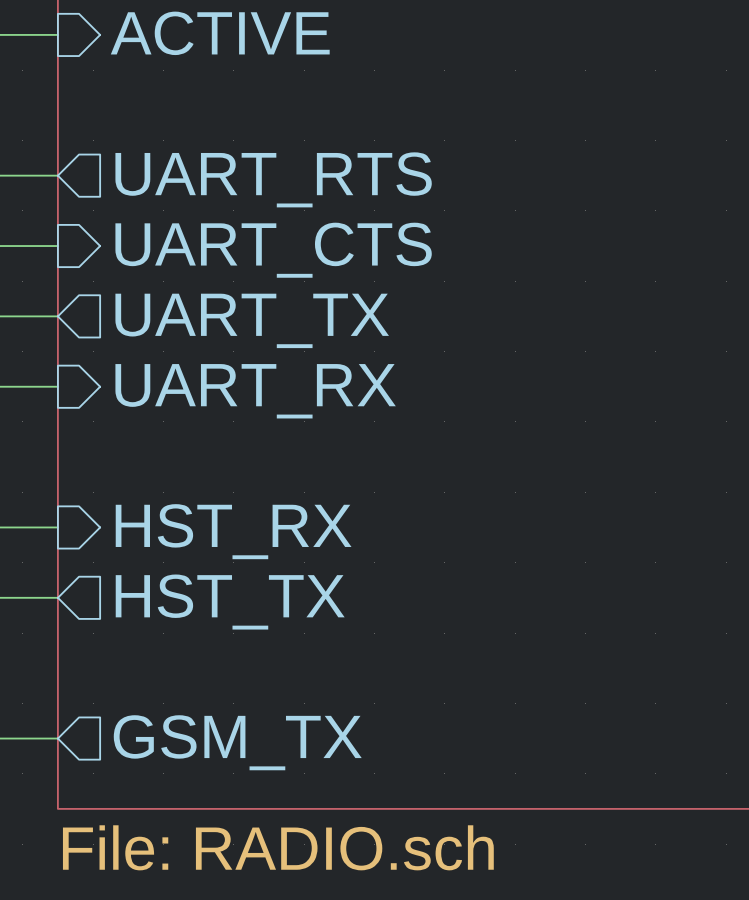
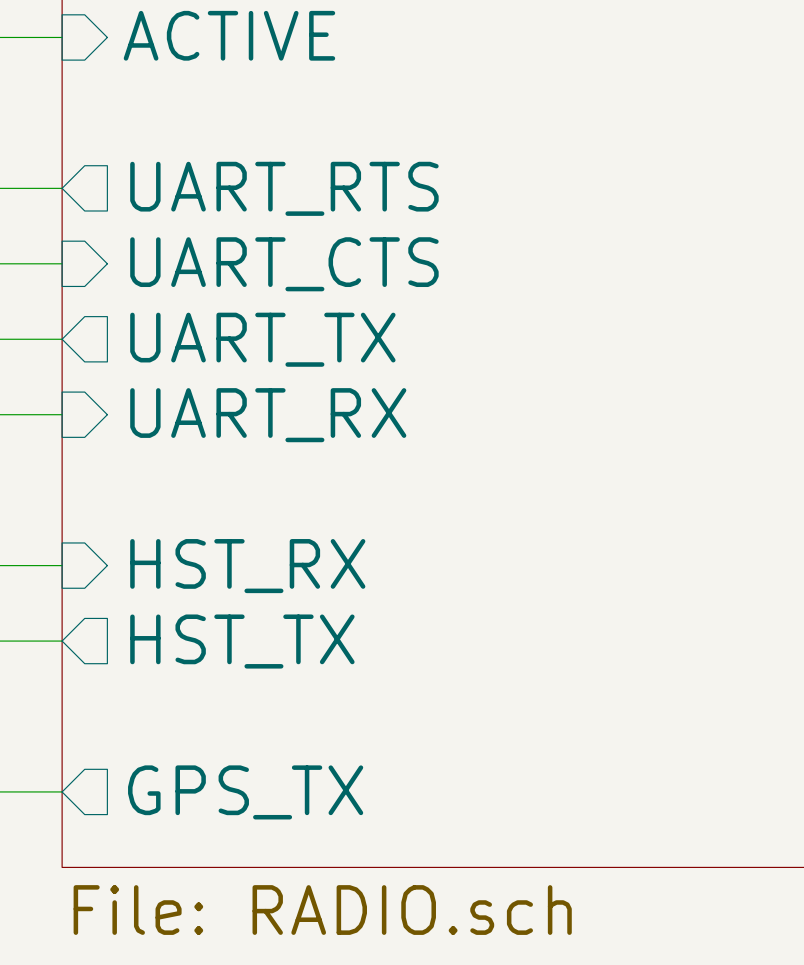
sheet pin: GSM_TX (237, 742) -> GPS_TX (245, 792)

